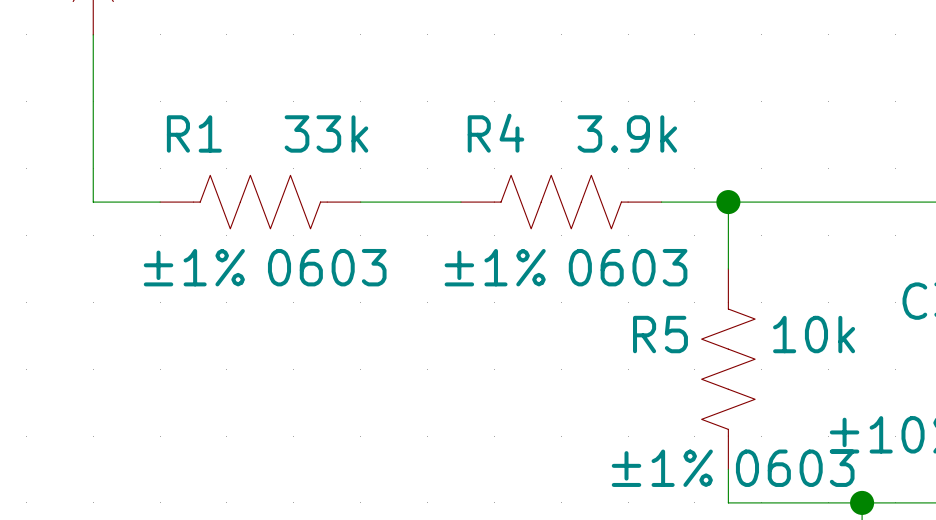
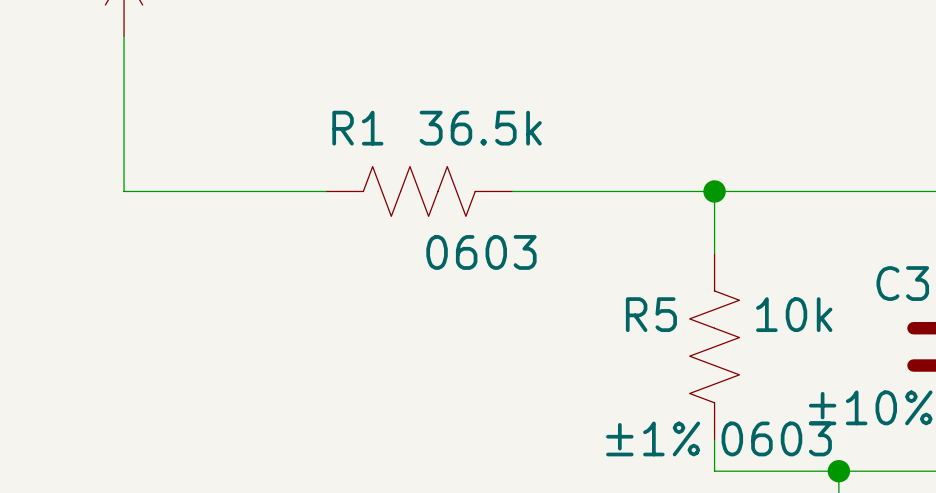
R1 value: 33k (326, 133) -> 36.5k (480, 128)
wire: none -> (186, 191) (326, 191)
R1 position: (260, 202) -> (419, 191)
wire: (360, 202) (460, 202) -> none
wire: none -> (512, 191) (652, 191)
R4: 3.9k (561, 202) -> none
R1 text: ±1% (194, 267) -> none

